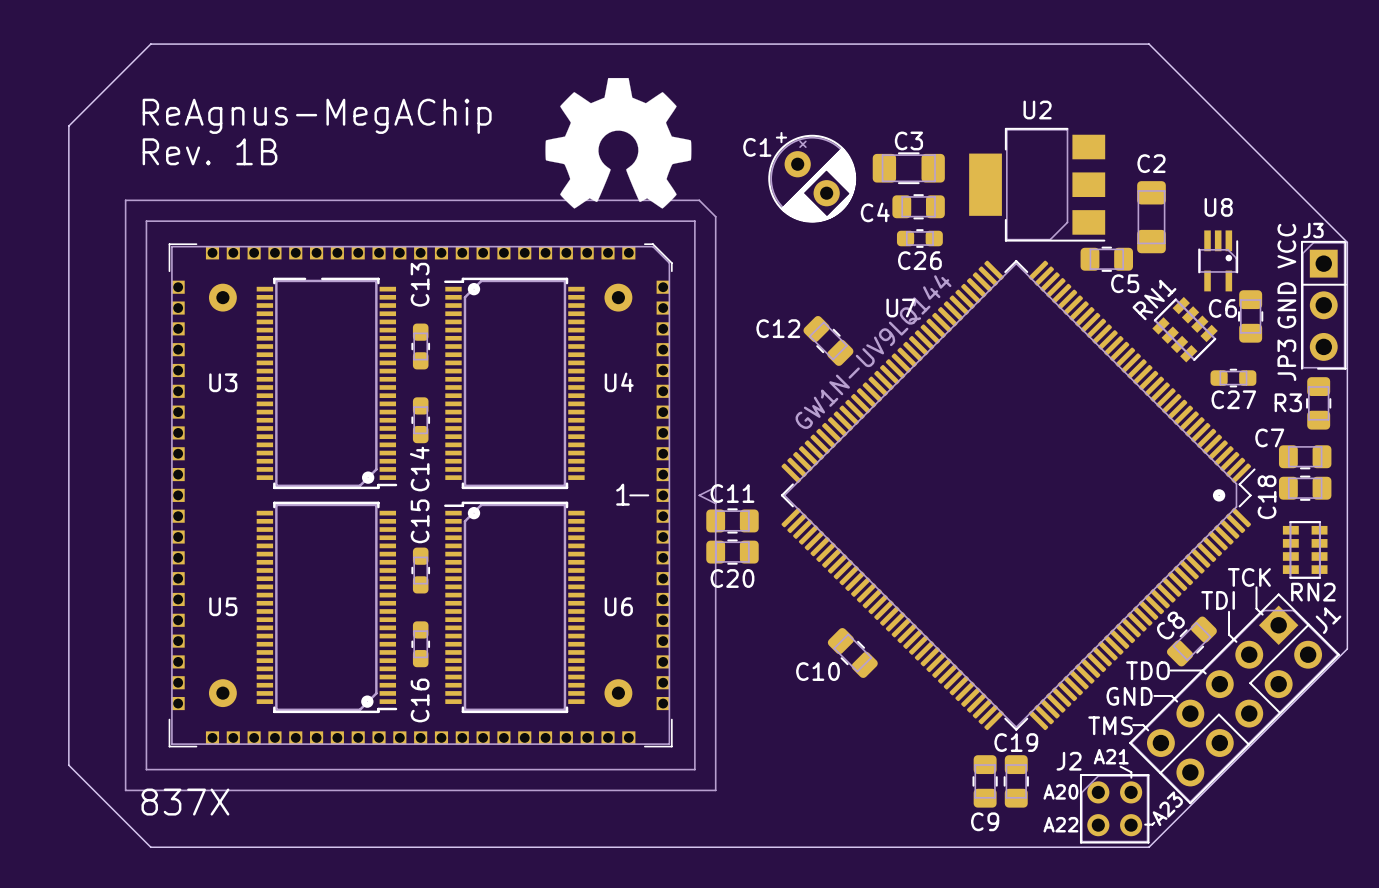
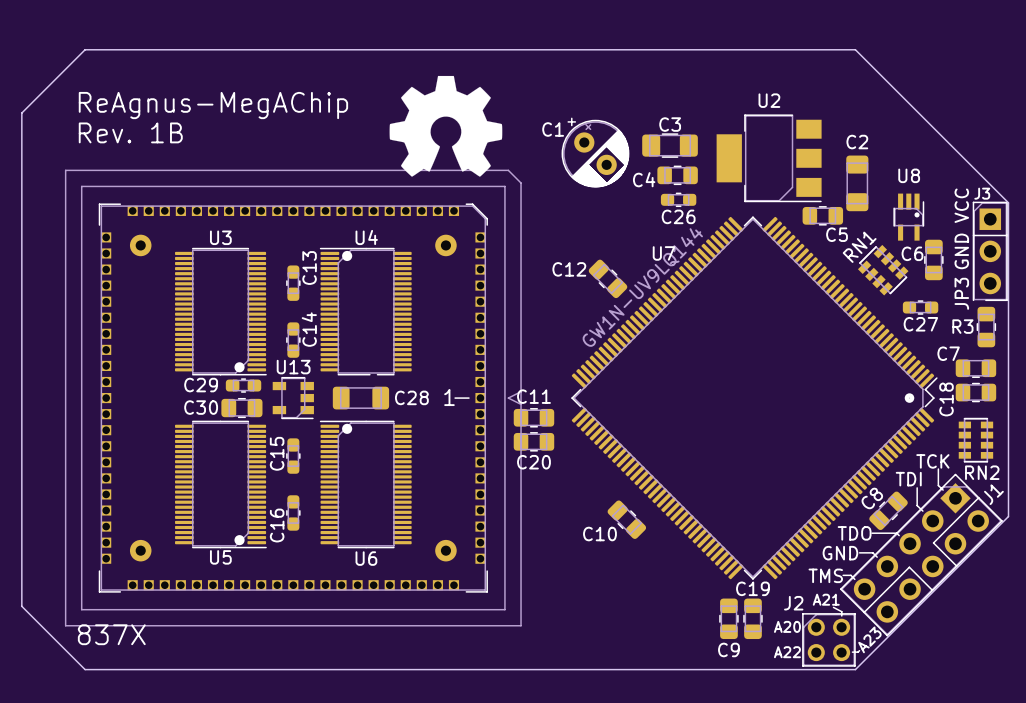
U3 footprint: [256, 277, 398, 490] -> [175, 247, 267, 376]
U4 footprint: [444, 277, 585, 490] -> [319, 247, 412, 376]
C13 name position: C13 (420, 284) -> C13 (309, 268)
U3 name position: U3 (223, 382) -> U3 (220, 237)
U4 name position: U4 (619, 382) -> U4 (366, 237)
C14 name position: C14 (419, 469) -> C14 (309, 329)
C29: none -> (243, 385)
U13: none -> (293, 398)
C28: none -> (360, 398)
U5 footprint: [256, 501, 398, 714] -> [175, 420, 267, 549]
U6 footprint: [444, 501, 585, 714] -> [319, 420, 412, 549]
C30: none -> (241, 408)
C15 name position: C15 (420, 521) -> C15 (277, 453)
U5 name position: U5 (223, 606) -> U5 (220, 557)
U6 name position: U6 (618, 606) -> U6 (366, 558)
C16 name position: C16 (420, 700) -> C16 (277, 525)

